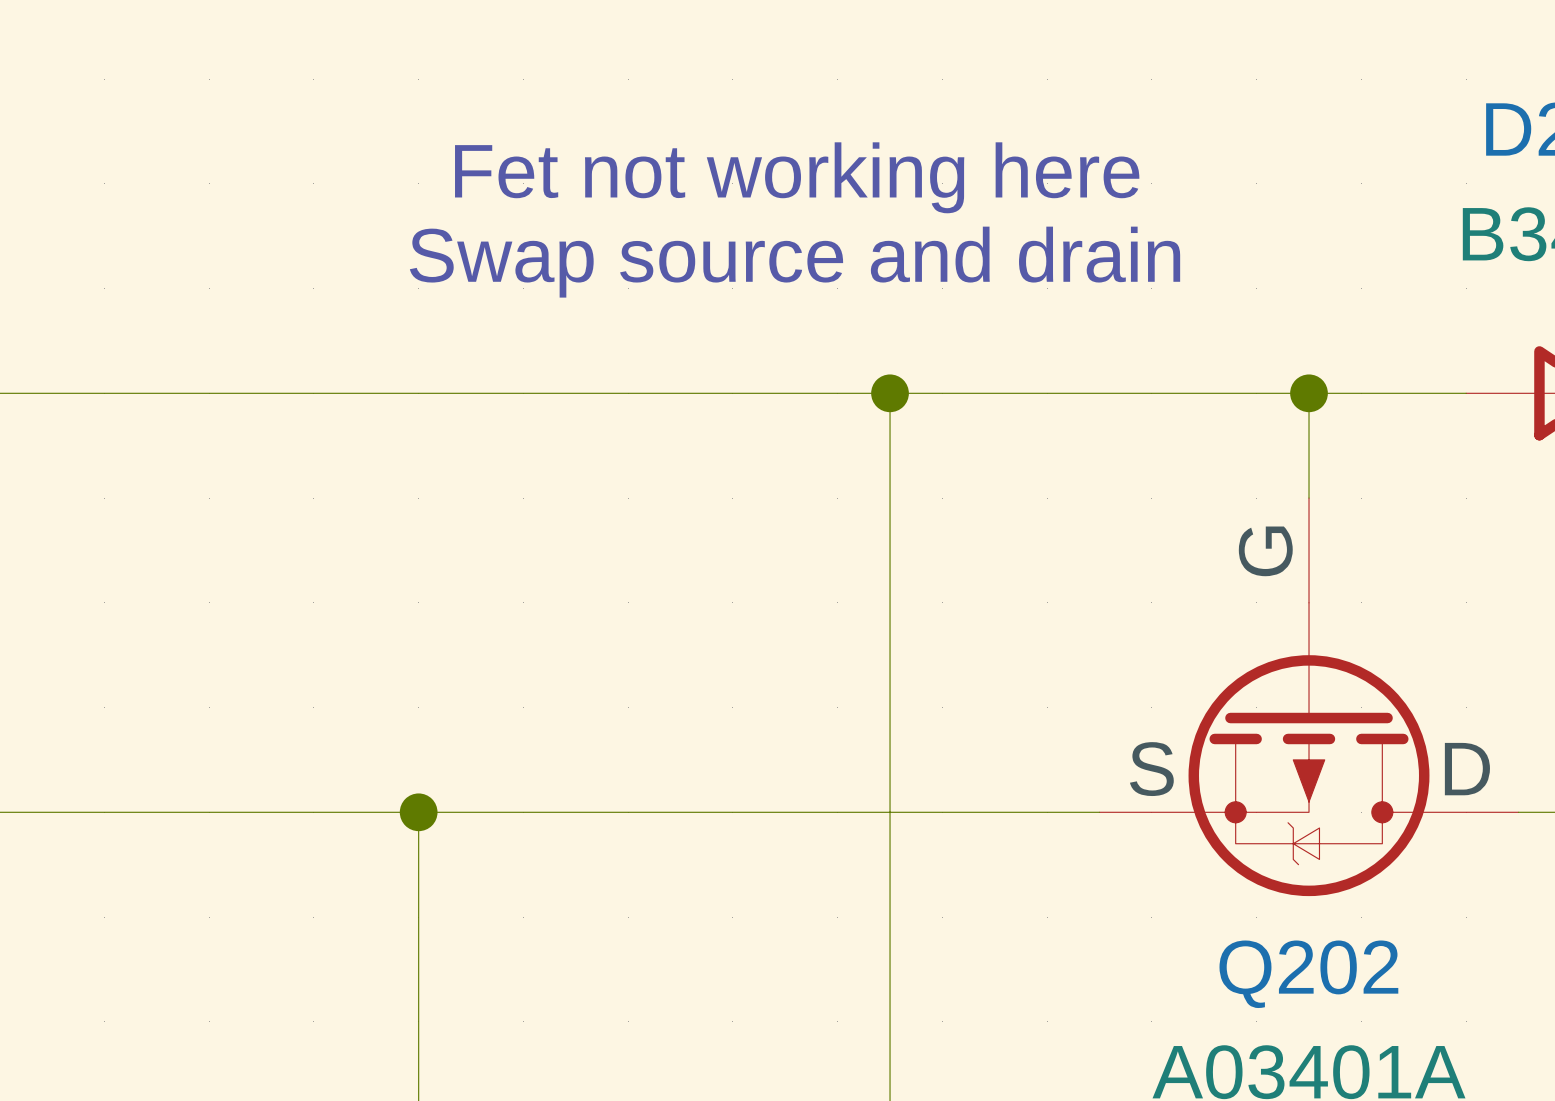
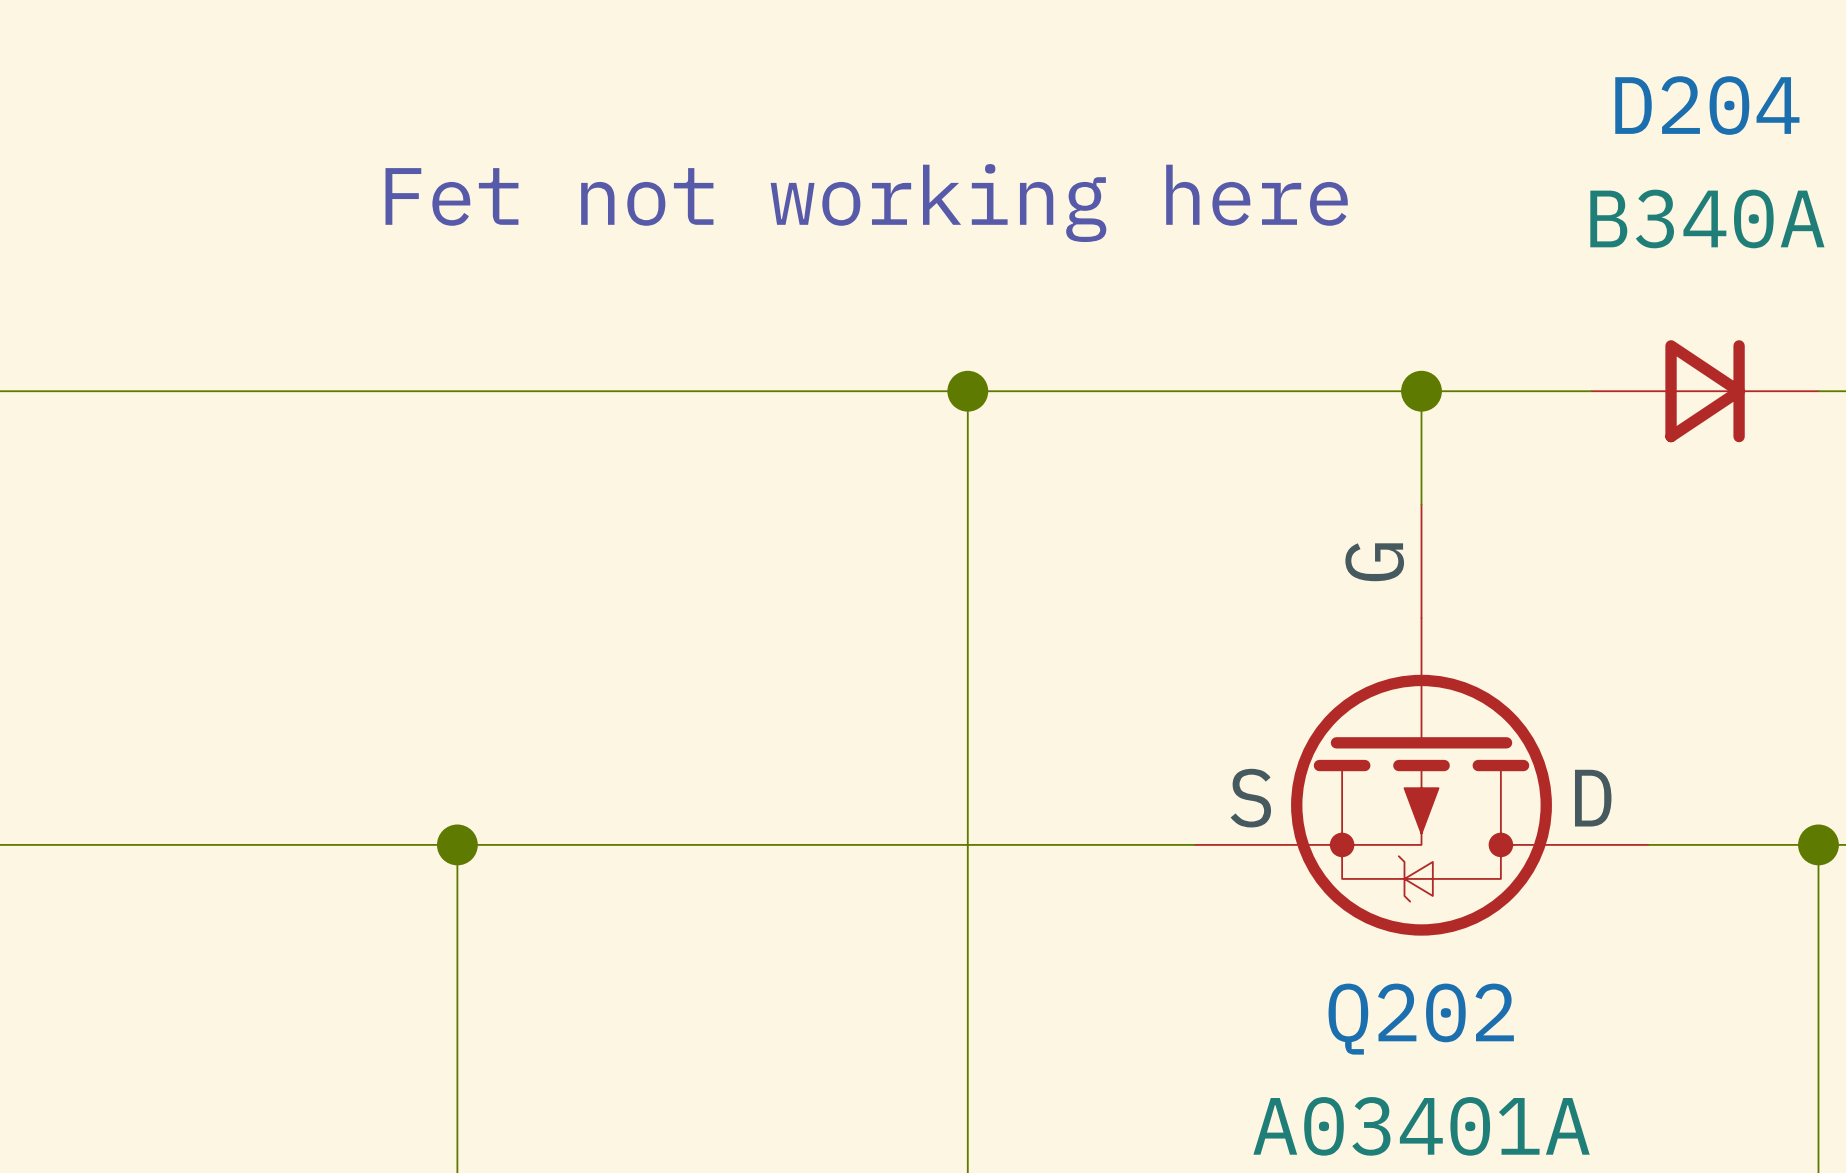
text position: Fet not working here (797, 177) -> Fet not working here (866, 203)
text: Swap source and drain (795, 262) -> none

